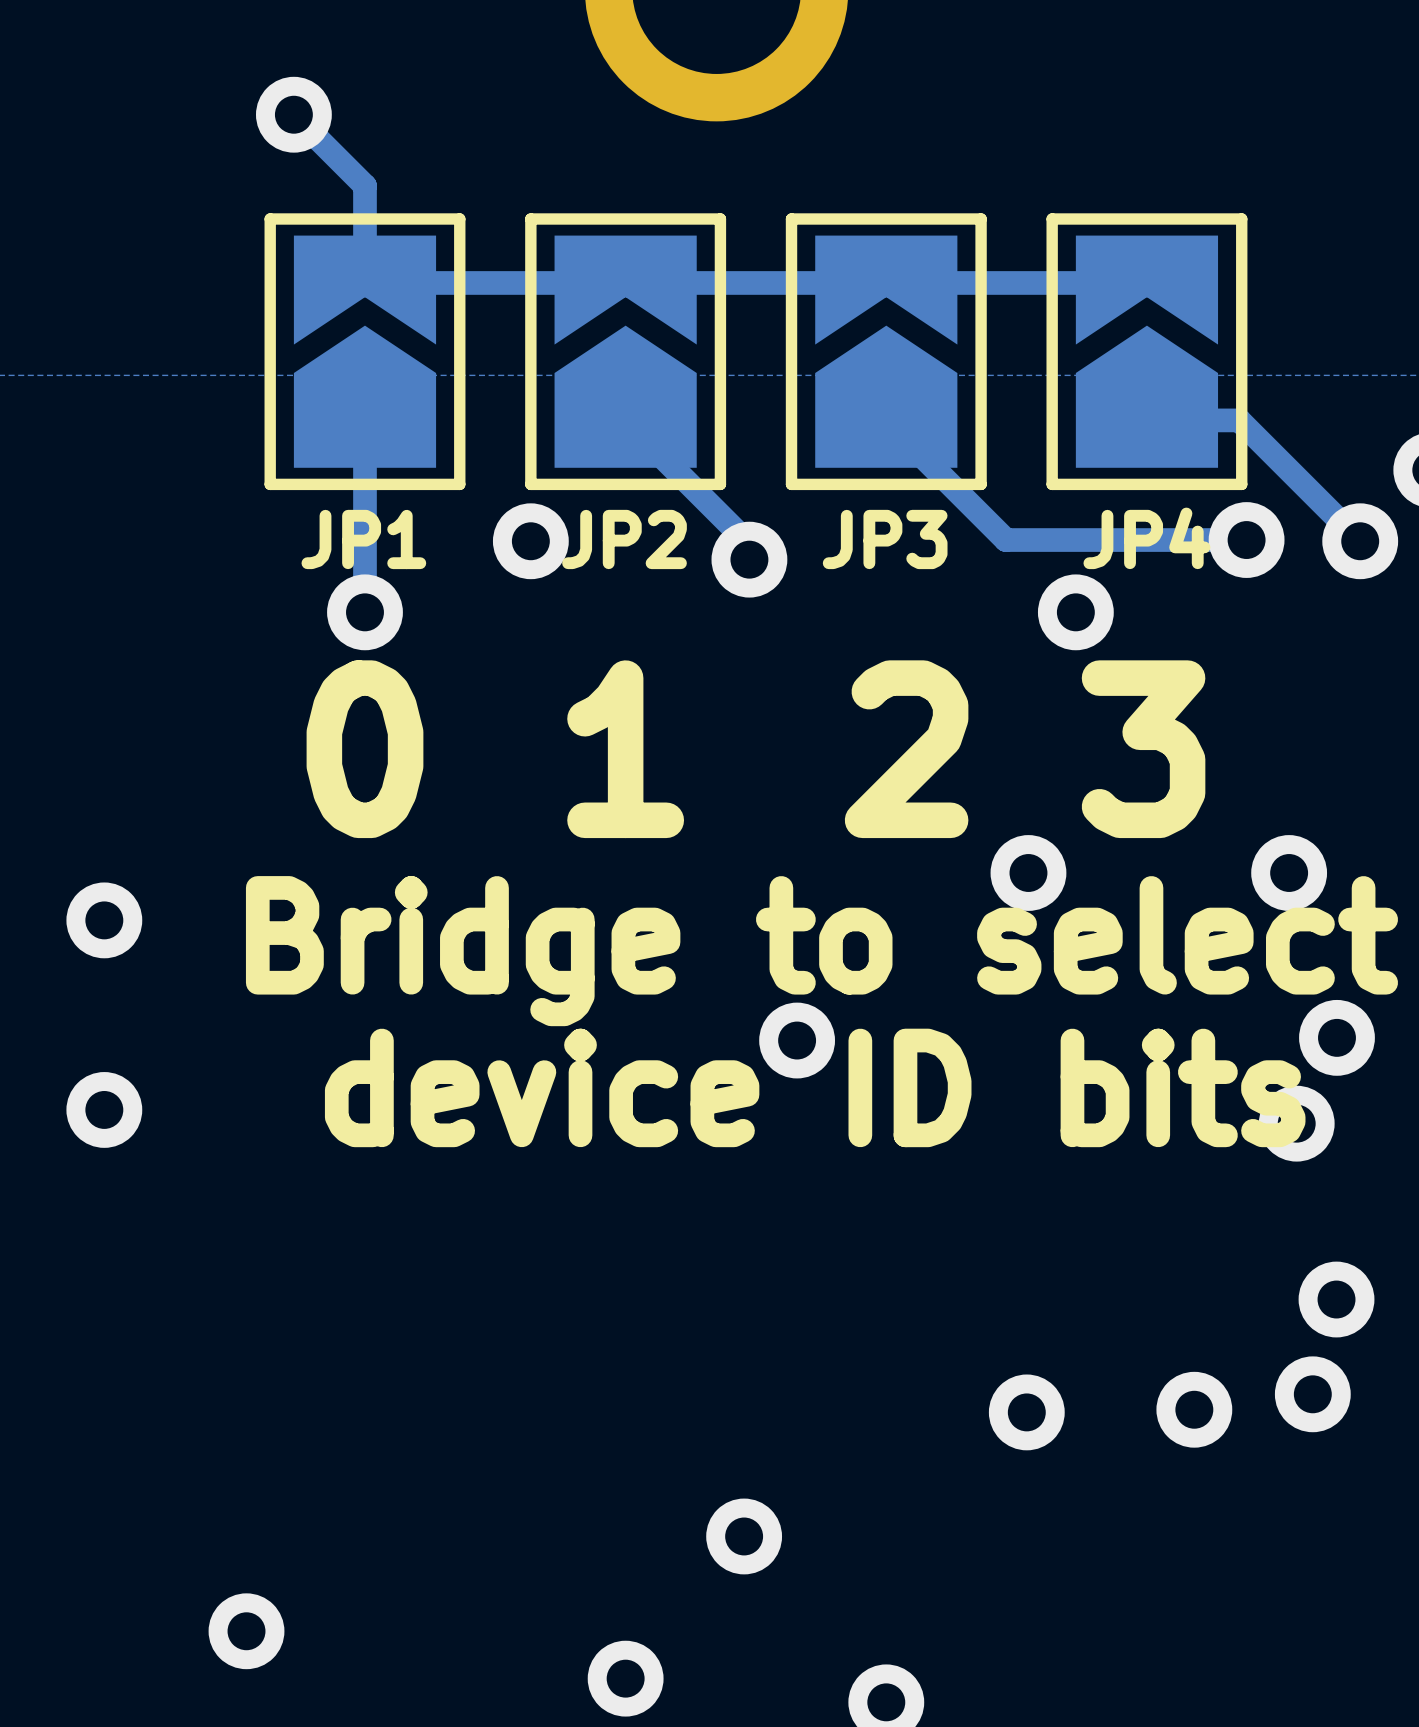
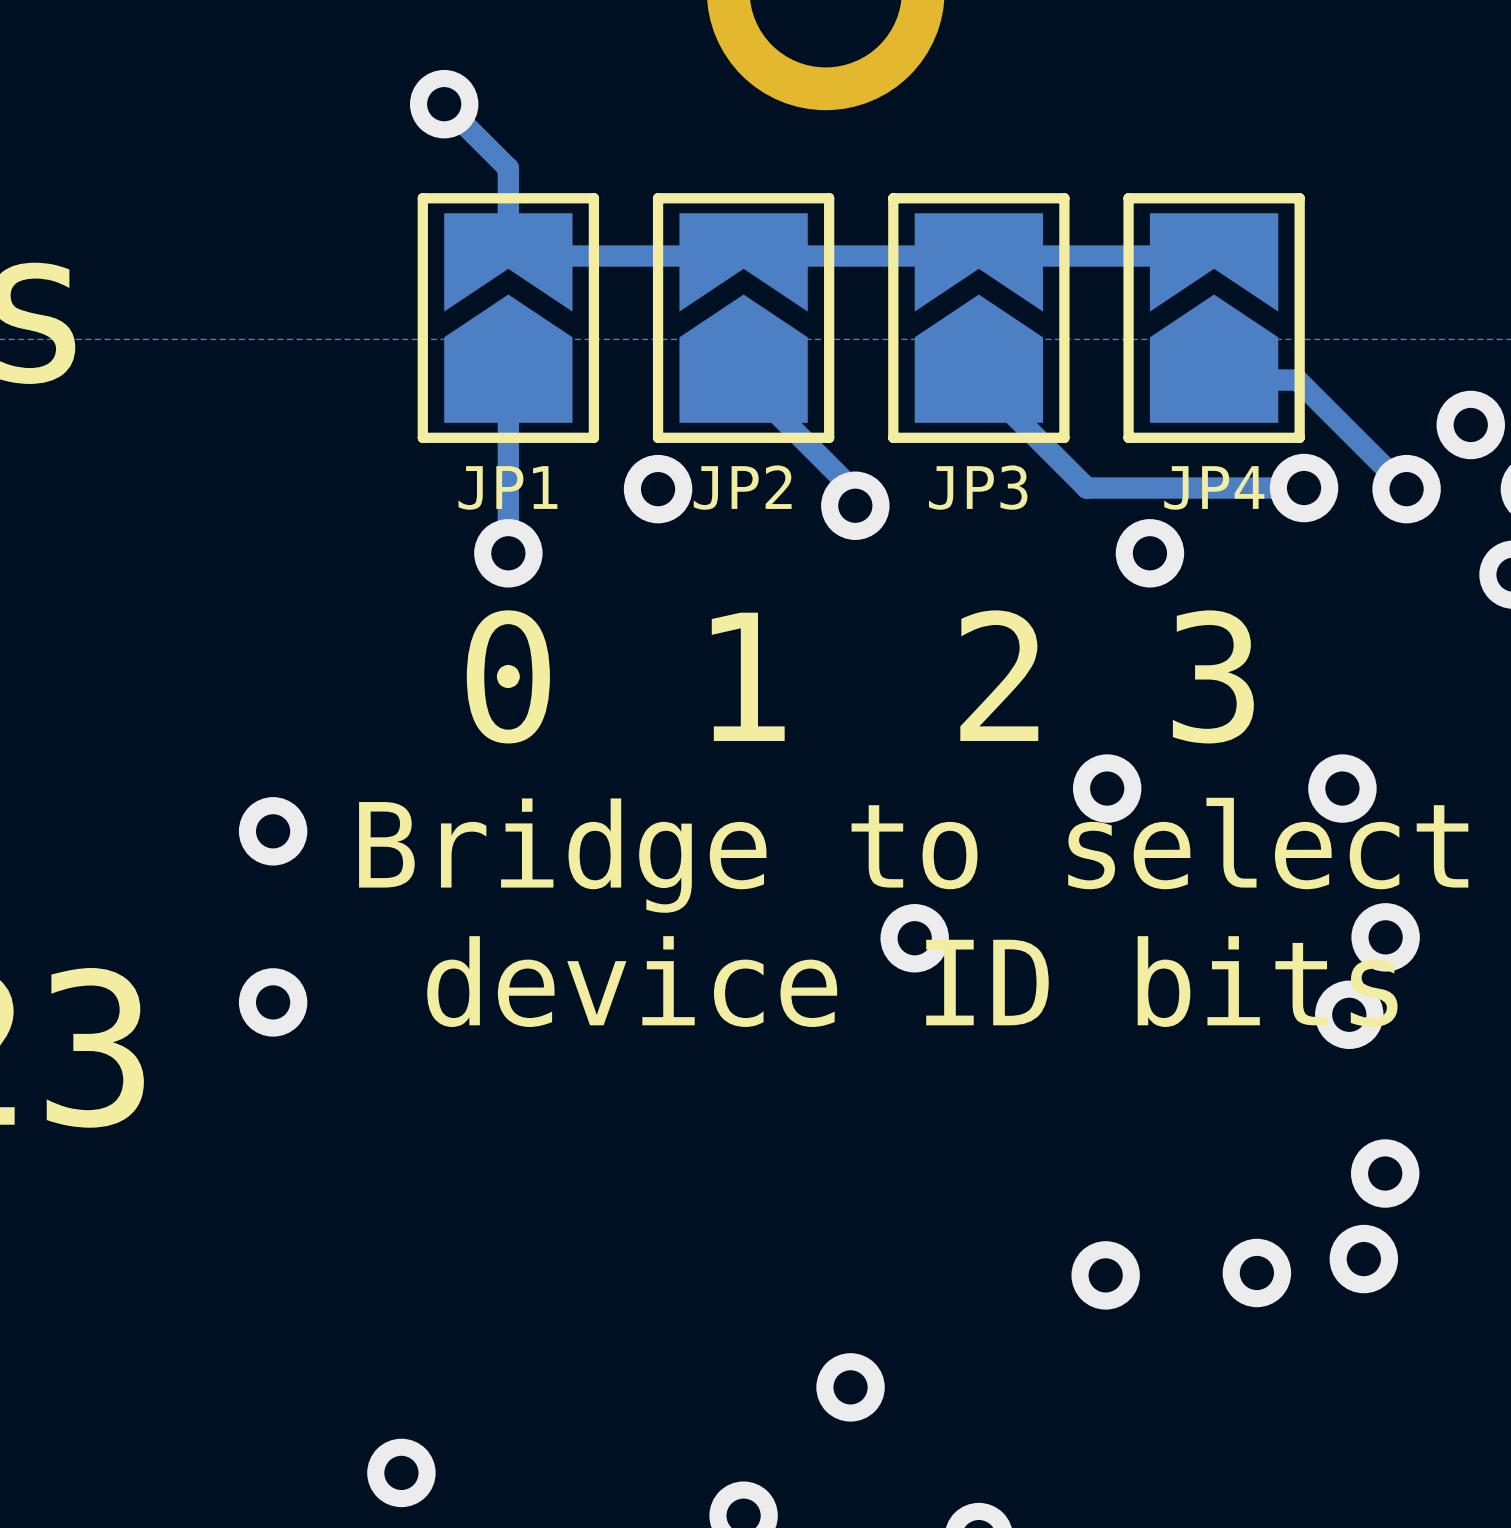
via position: (797, 1040) -> (914, 938)

